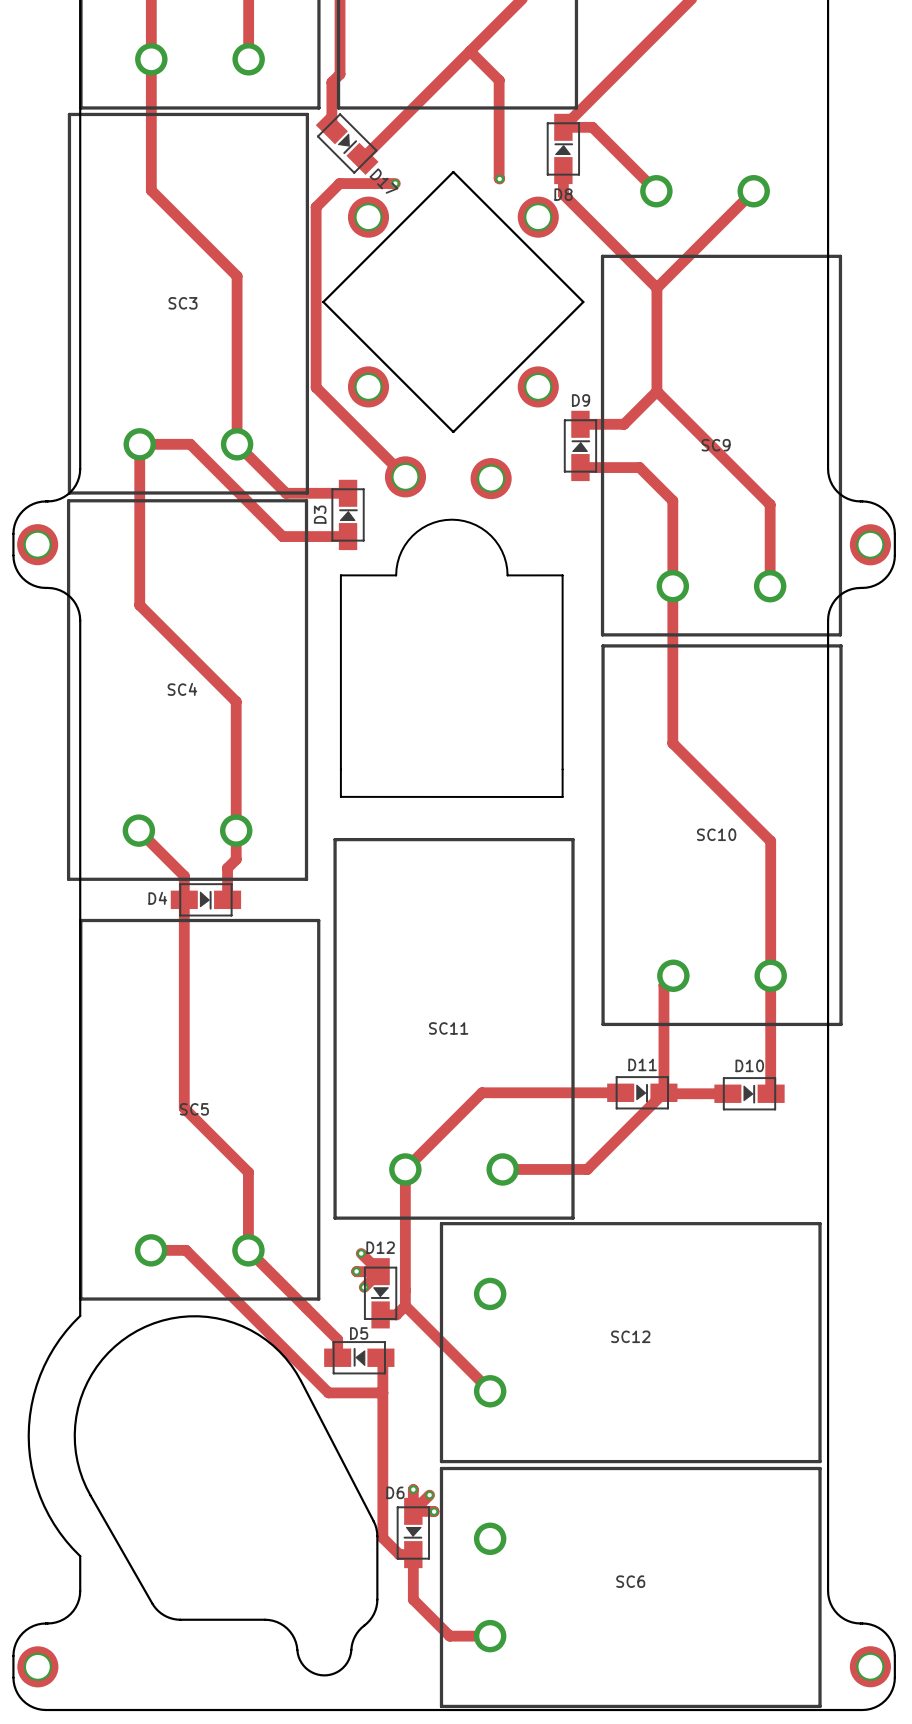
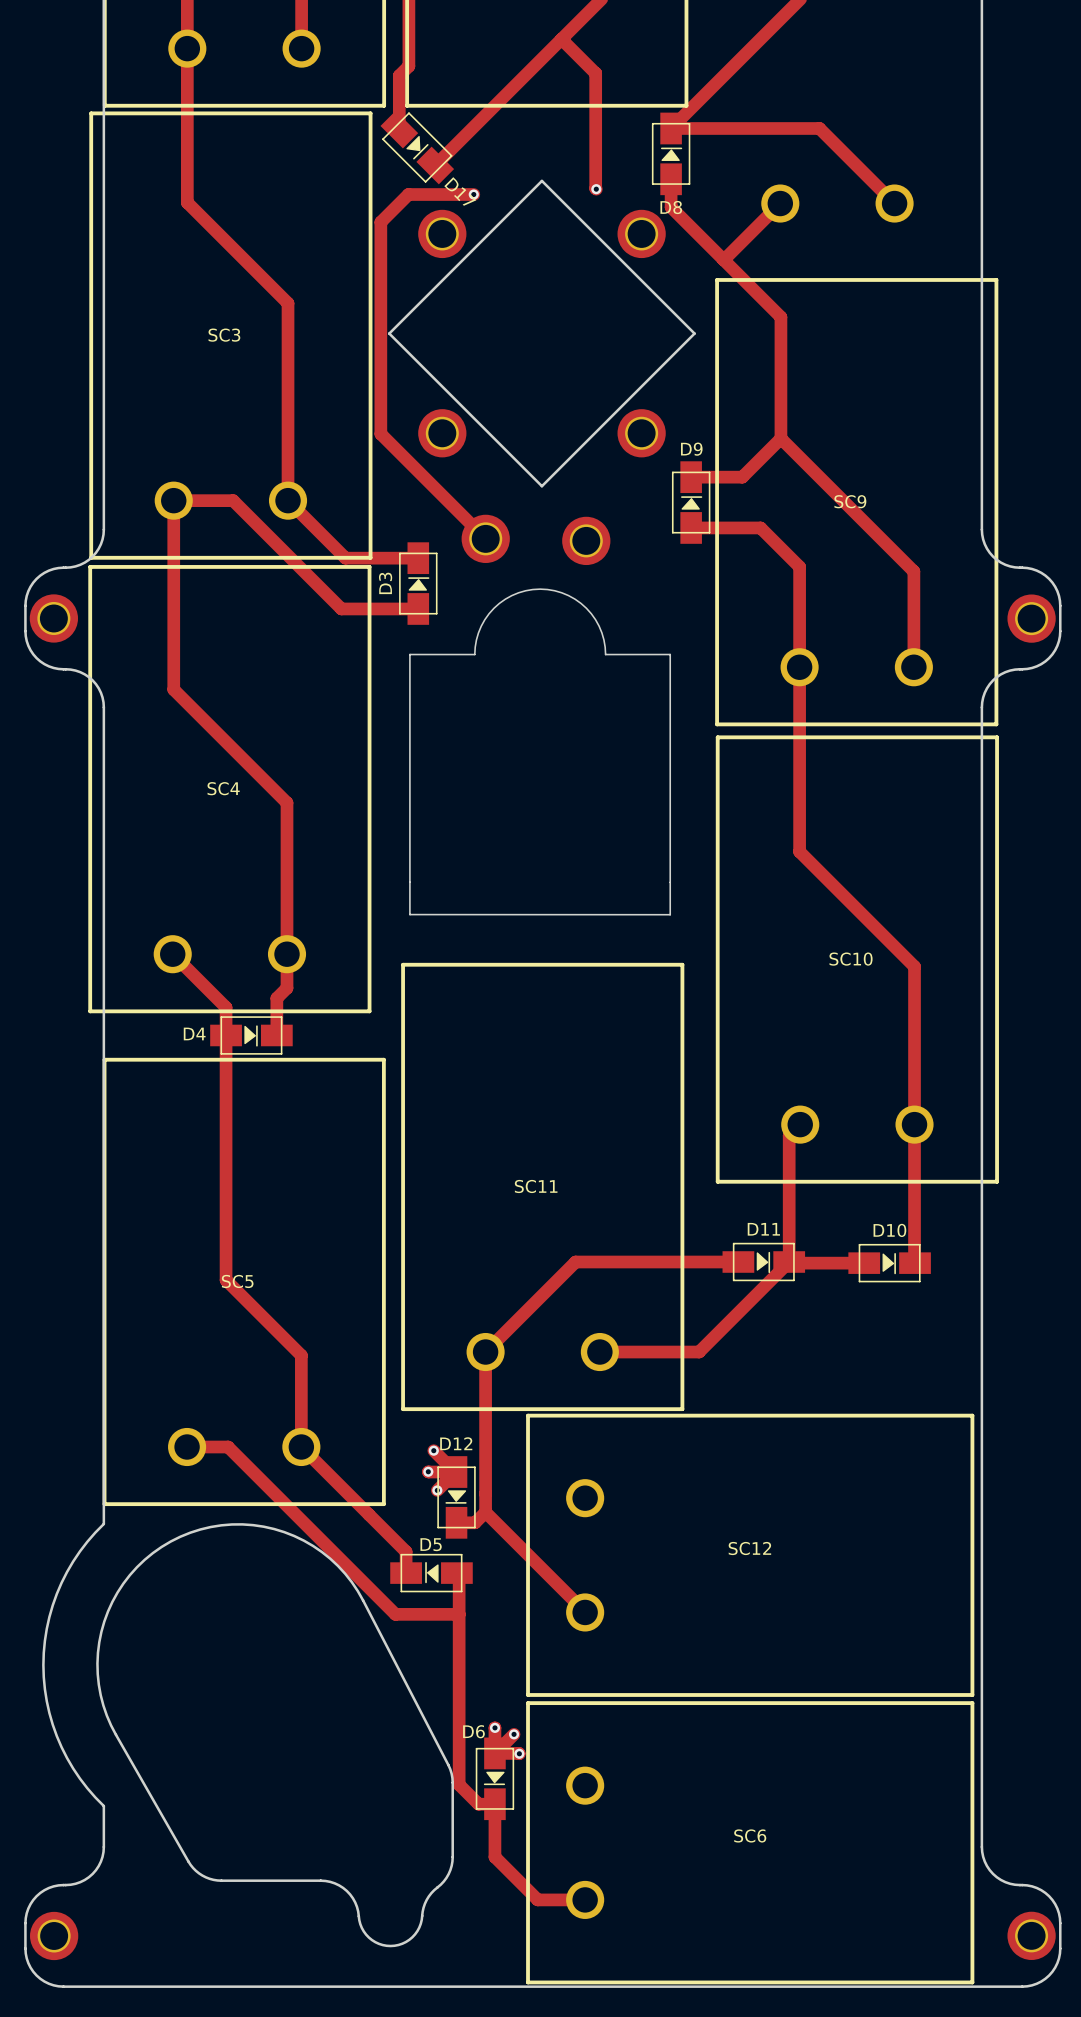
track: (592, 127) (656, 191) -> (705, 128) (819, 128) (894, 203)
track: none -> (780, 203) (723, 259)
track: (753, 191) (656, 288) -> none

